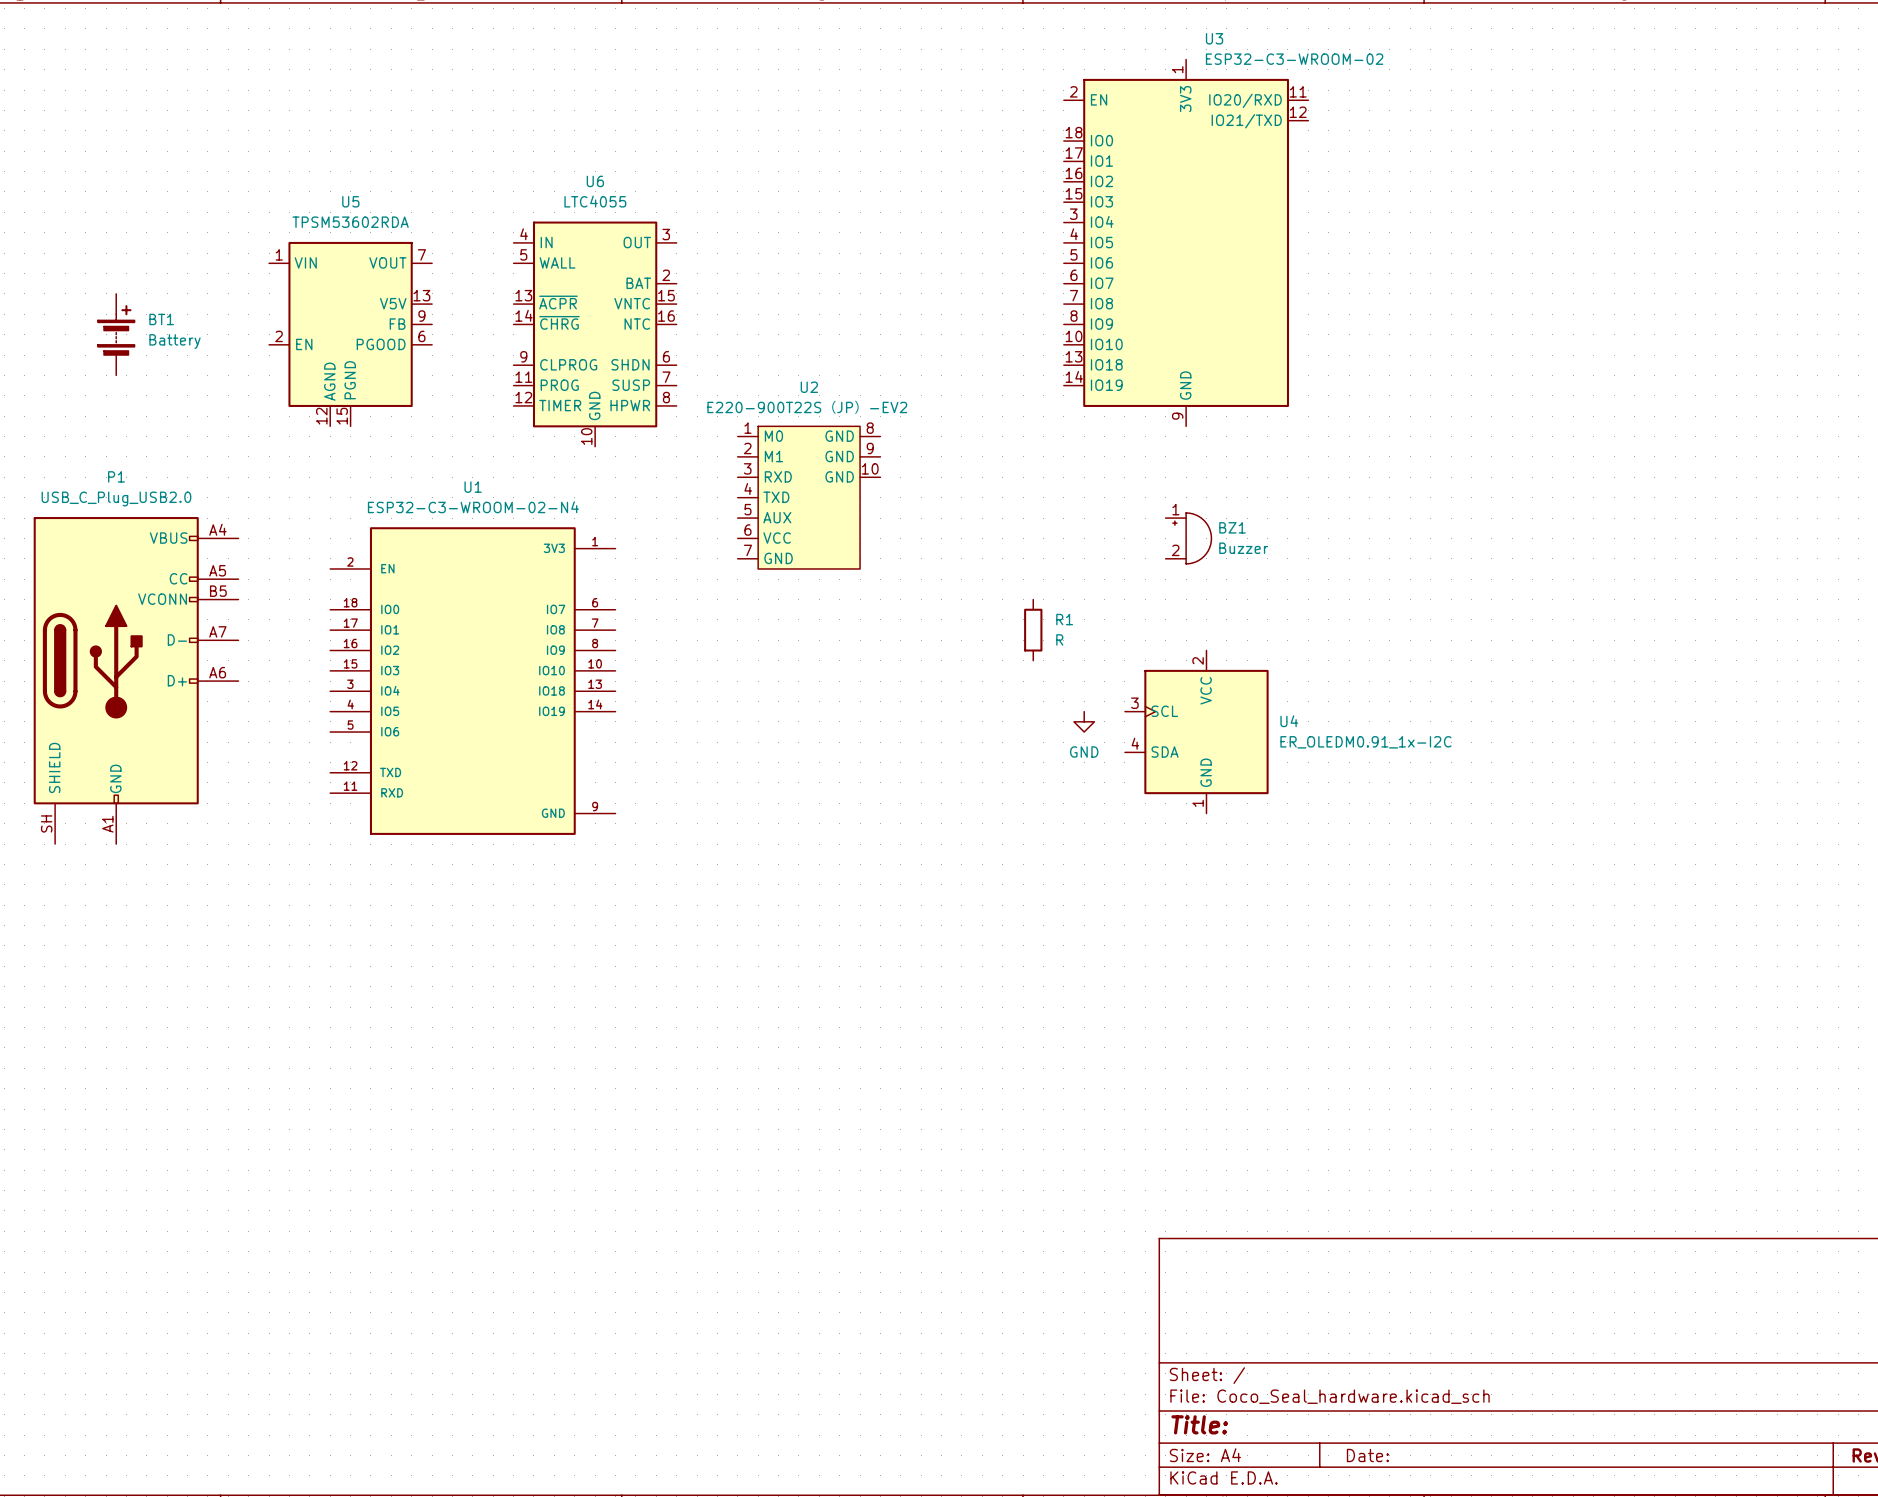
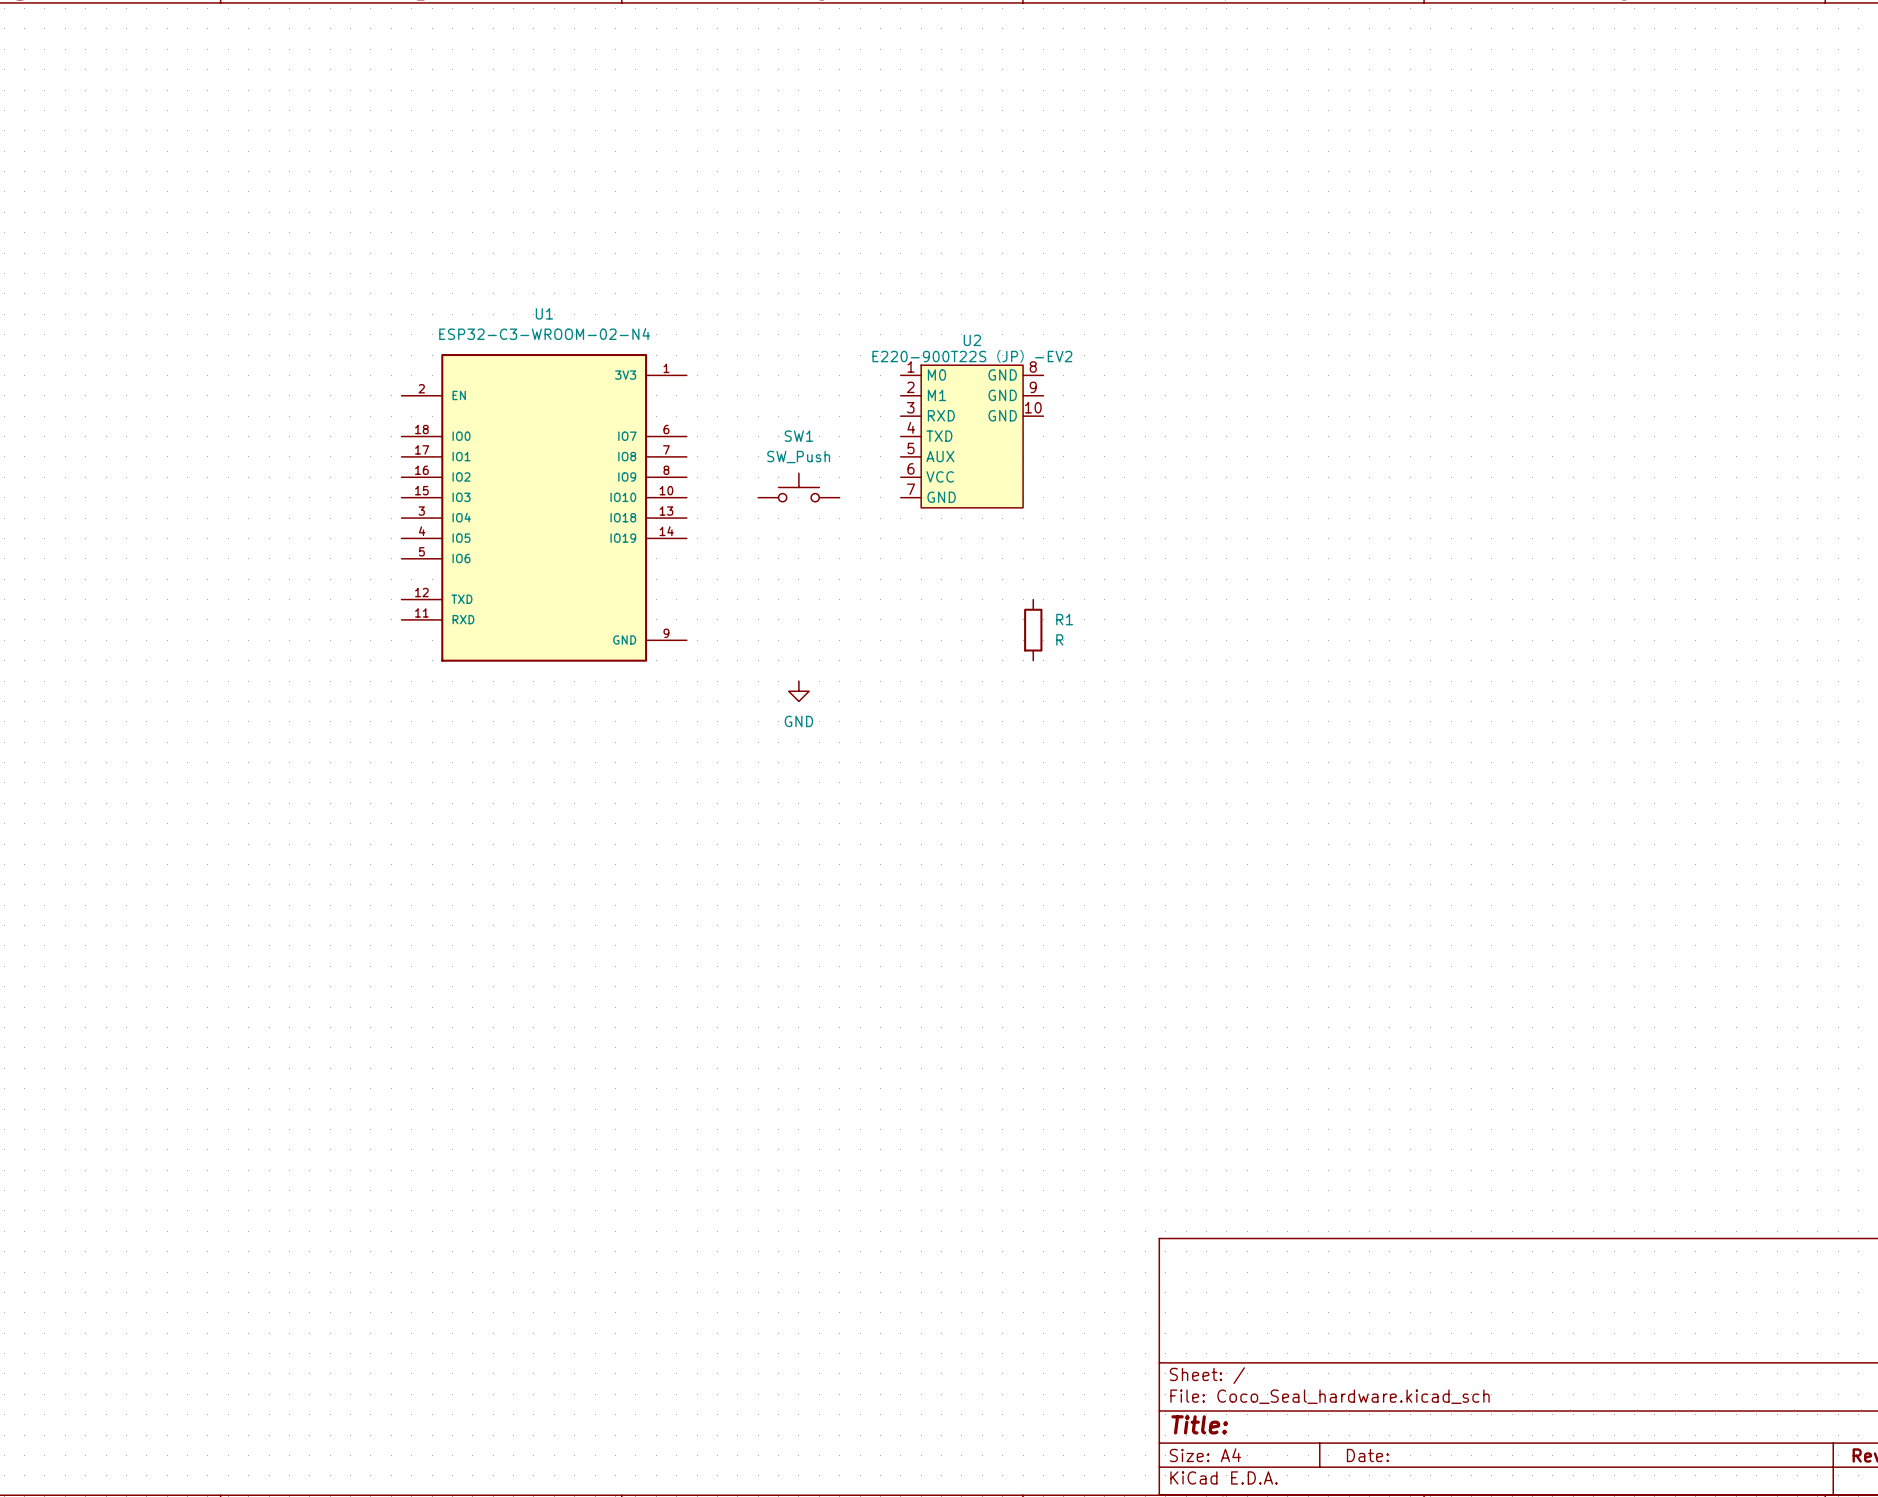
U3: ESP32-C3-WROOM-02 (1186, 242) -> none
BT1: Battery (116, 334) -> none
U5: TPSM53602RDA (350, 334) -> none
U6: LTC4055 (595, 334) -> none
U2 name position: U2 (809, 387) -> U2 (972, 340)
U2 value position: E220-900T22S（JP）-EV2 (807, 407) -> E220-900T22S（JP）-EV2 (972, 356)
SW1: none -> SW_Push (798, 487)
U2 position: (809, 497) -> (972, 436)
BZ1: Buzzer (1188, 538) -> none
P1: USB_C_Plug_USB2.0 (136, 680) -> none
U1 position: (472, 681) -> (544, 507)
power symbol: none -> GND (798, 691)
power symbol: GND (1084, 721) -> none
U4: ER_OLEDM0.91_1x-I2C (1196, 732) -> none

